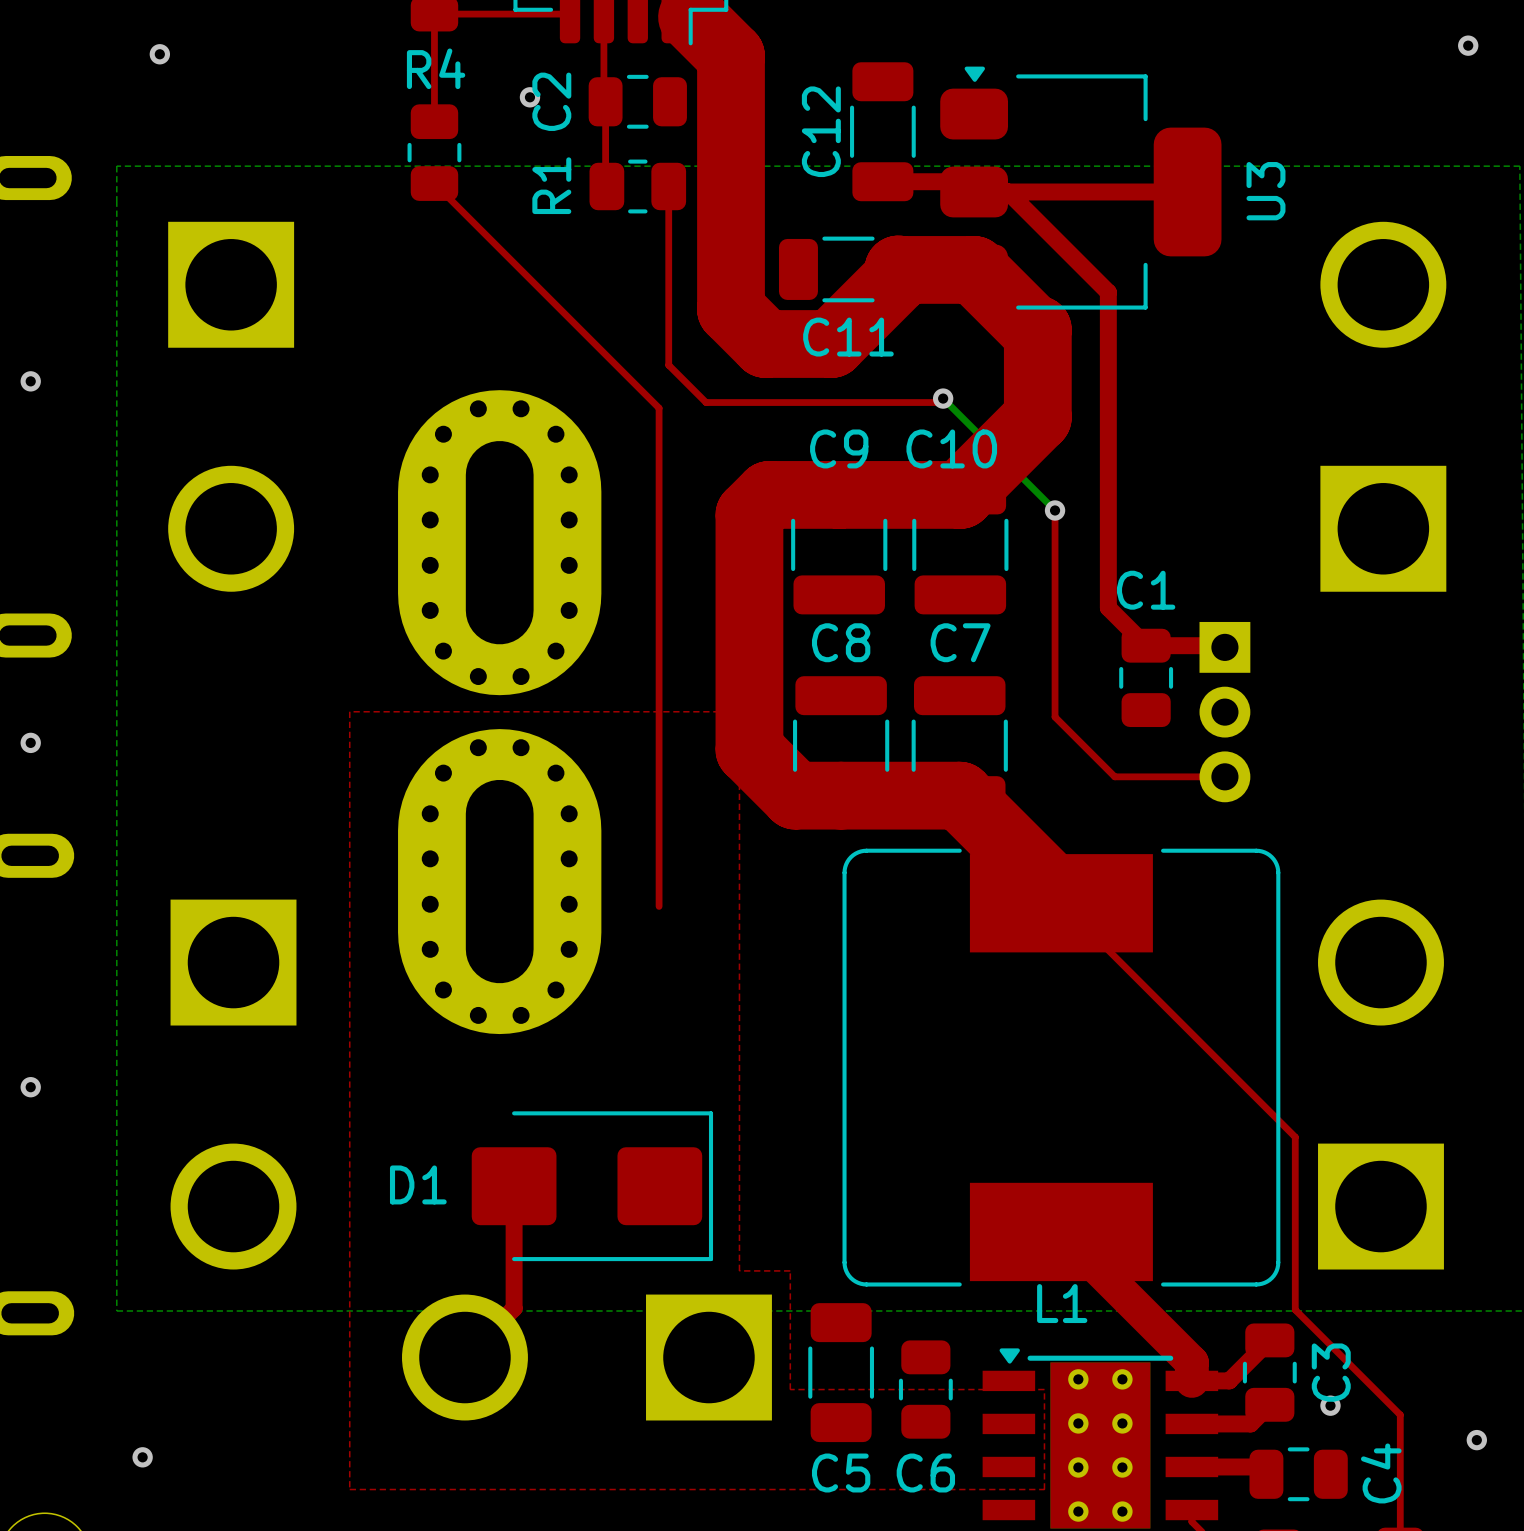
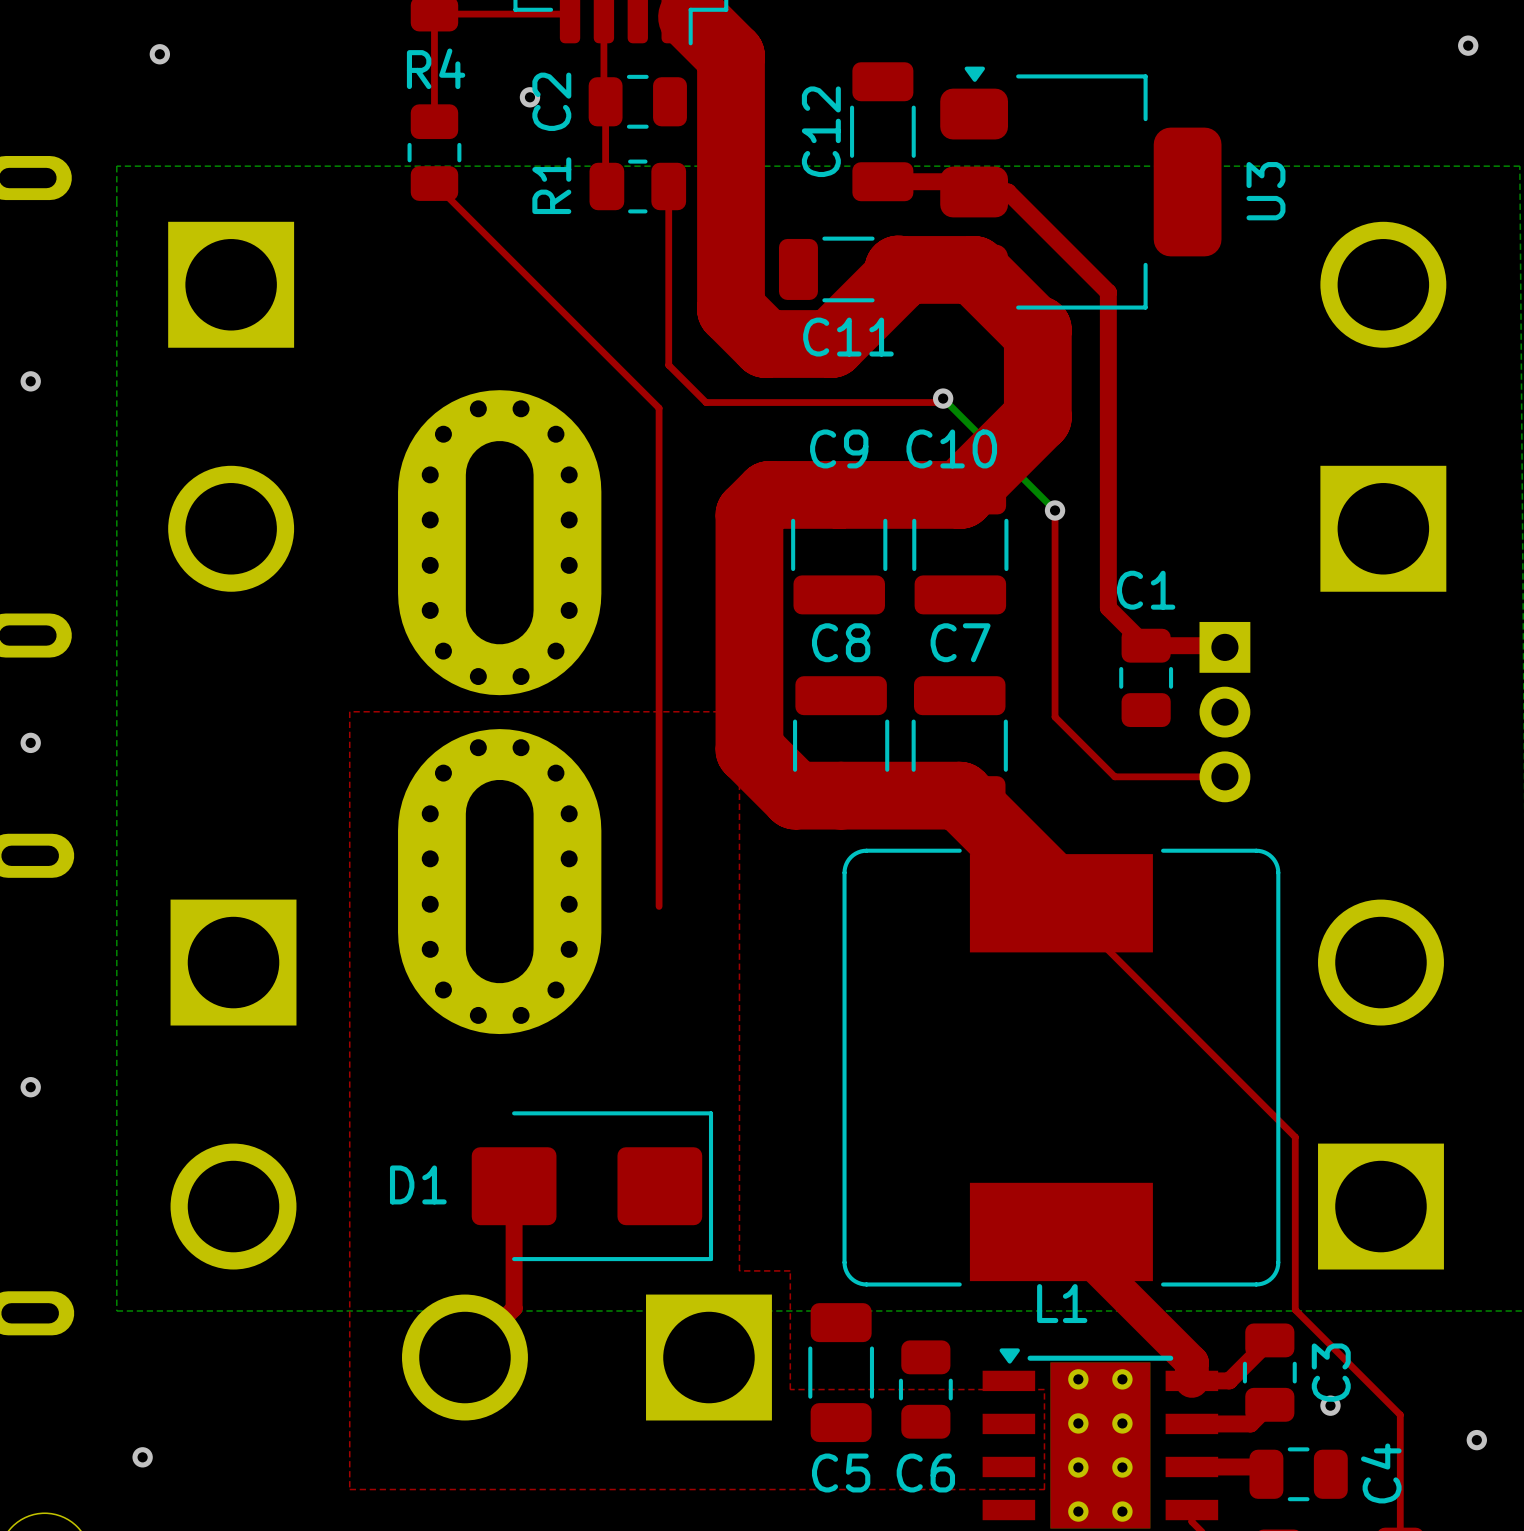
top track: (1008, 191) (1187, 191) -> none

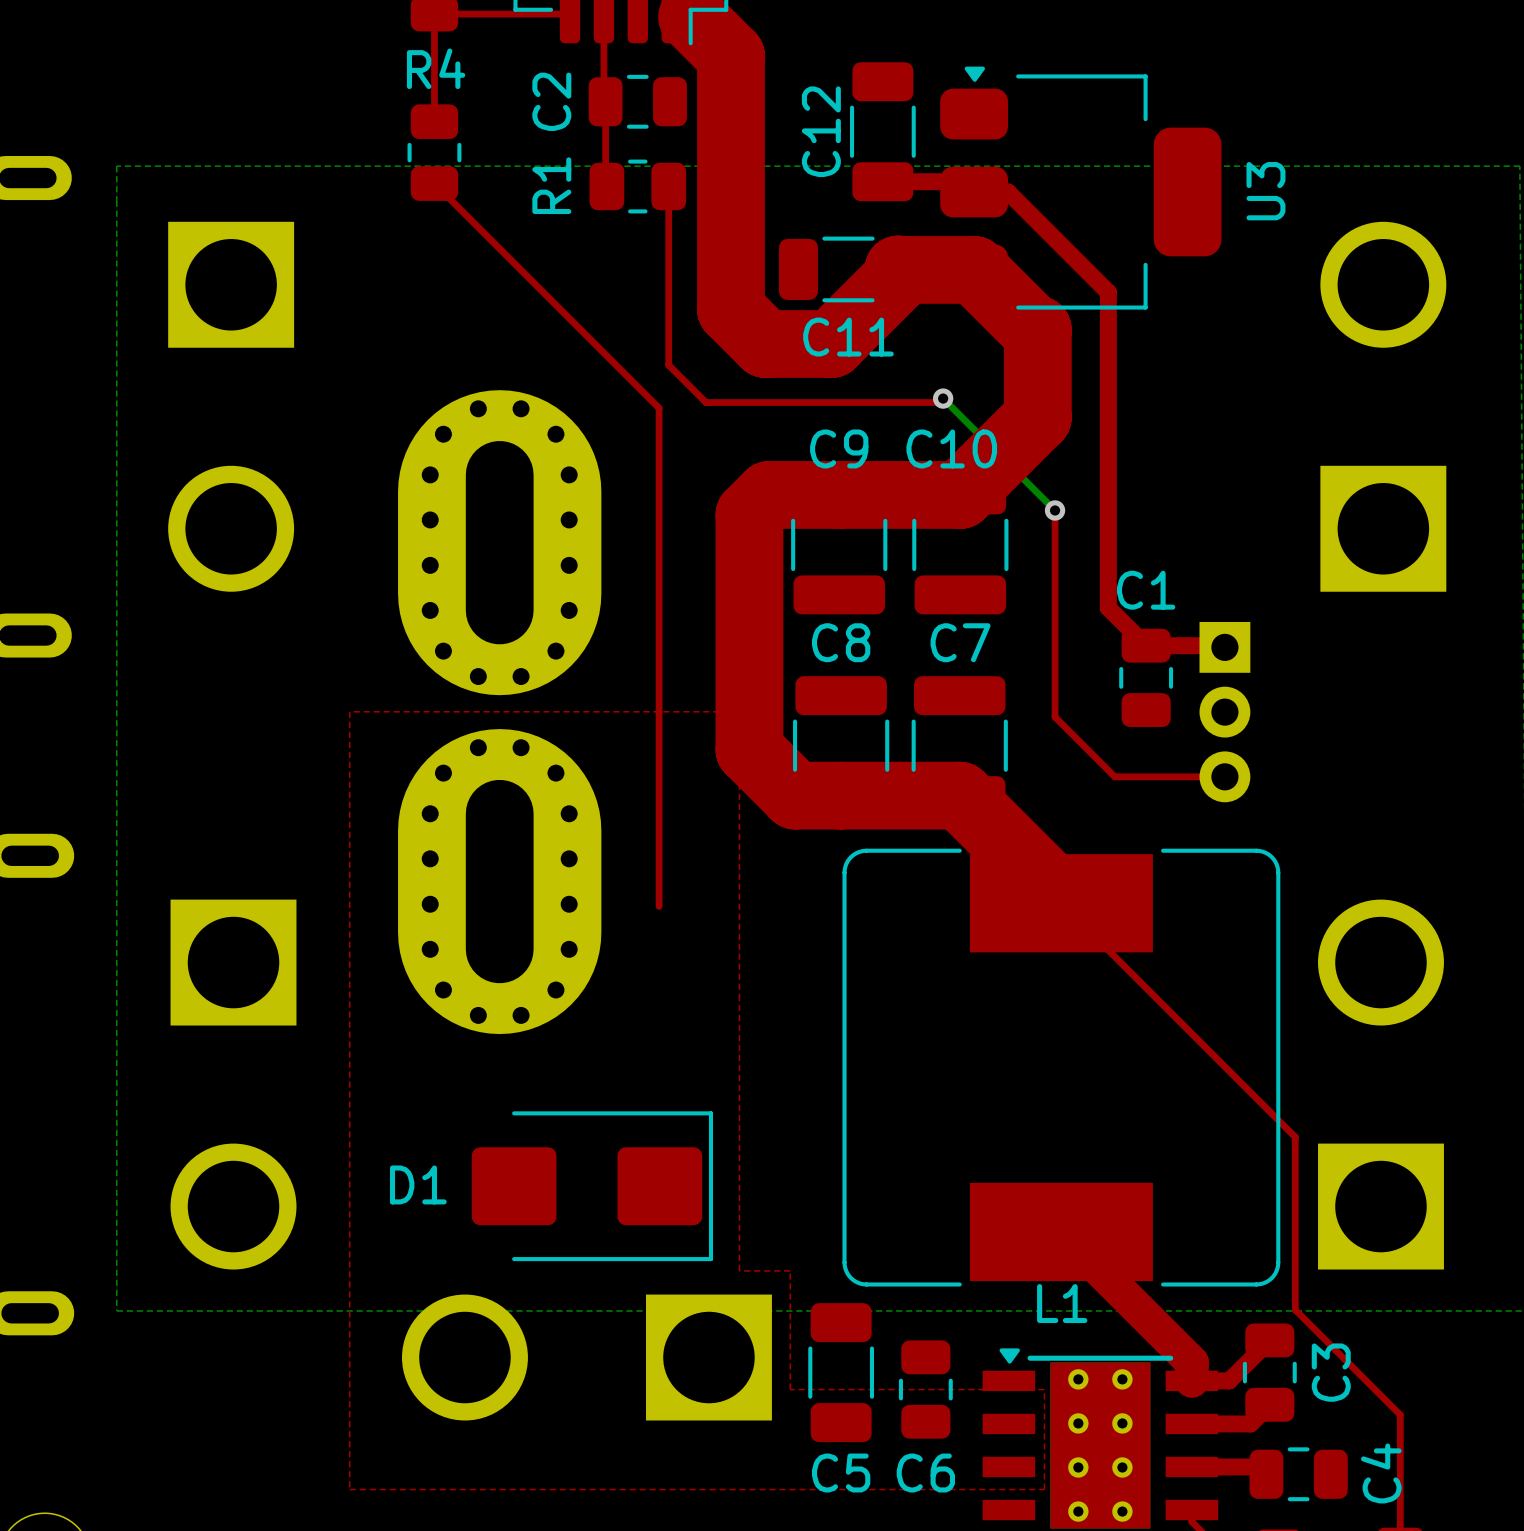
via: (1468, 45) -> none
via: (159, 54) -> none
via: (529, 97) -> none
via: (30, 381) -> none
via: (30, 742) -> none
via: (30, 1087) -> none
top track: (514, 1186) (514, 1308) (464, 1357) -> none
via: (1330, 1405) -> none
via: (1476, 1440) -> none
via: (142, 1457) -> none

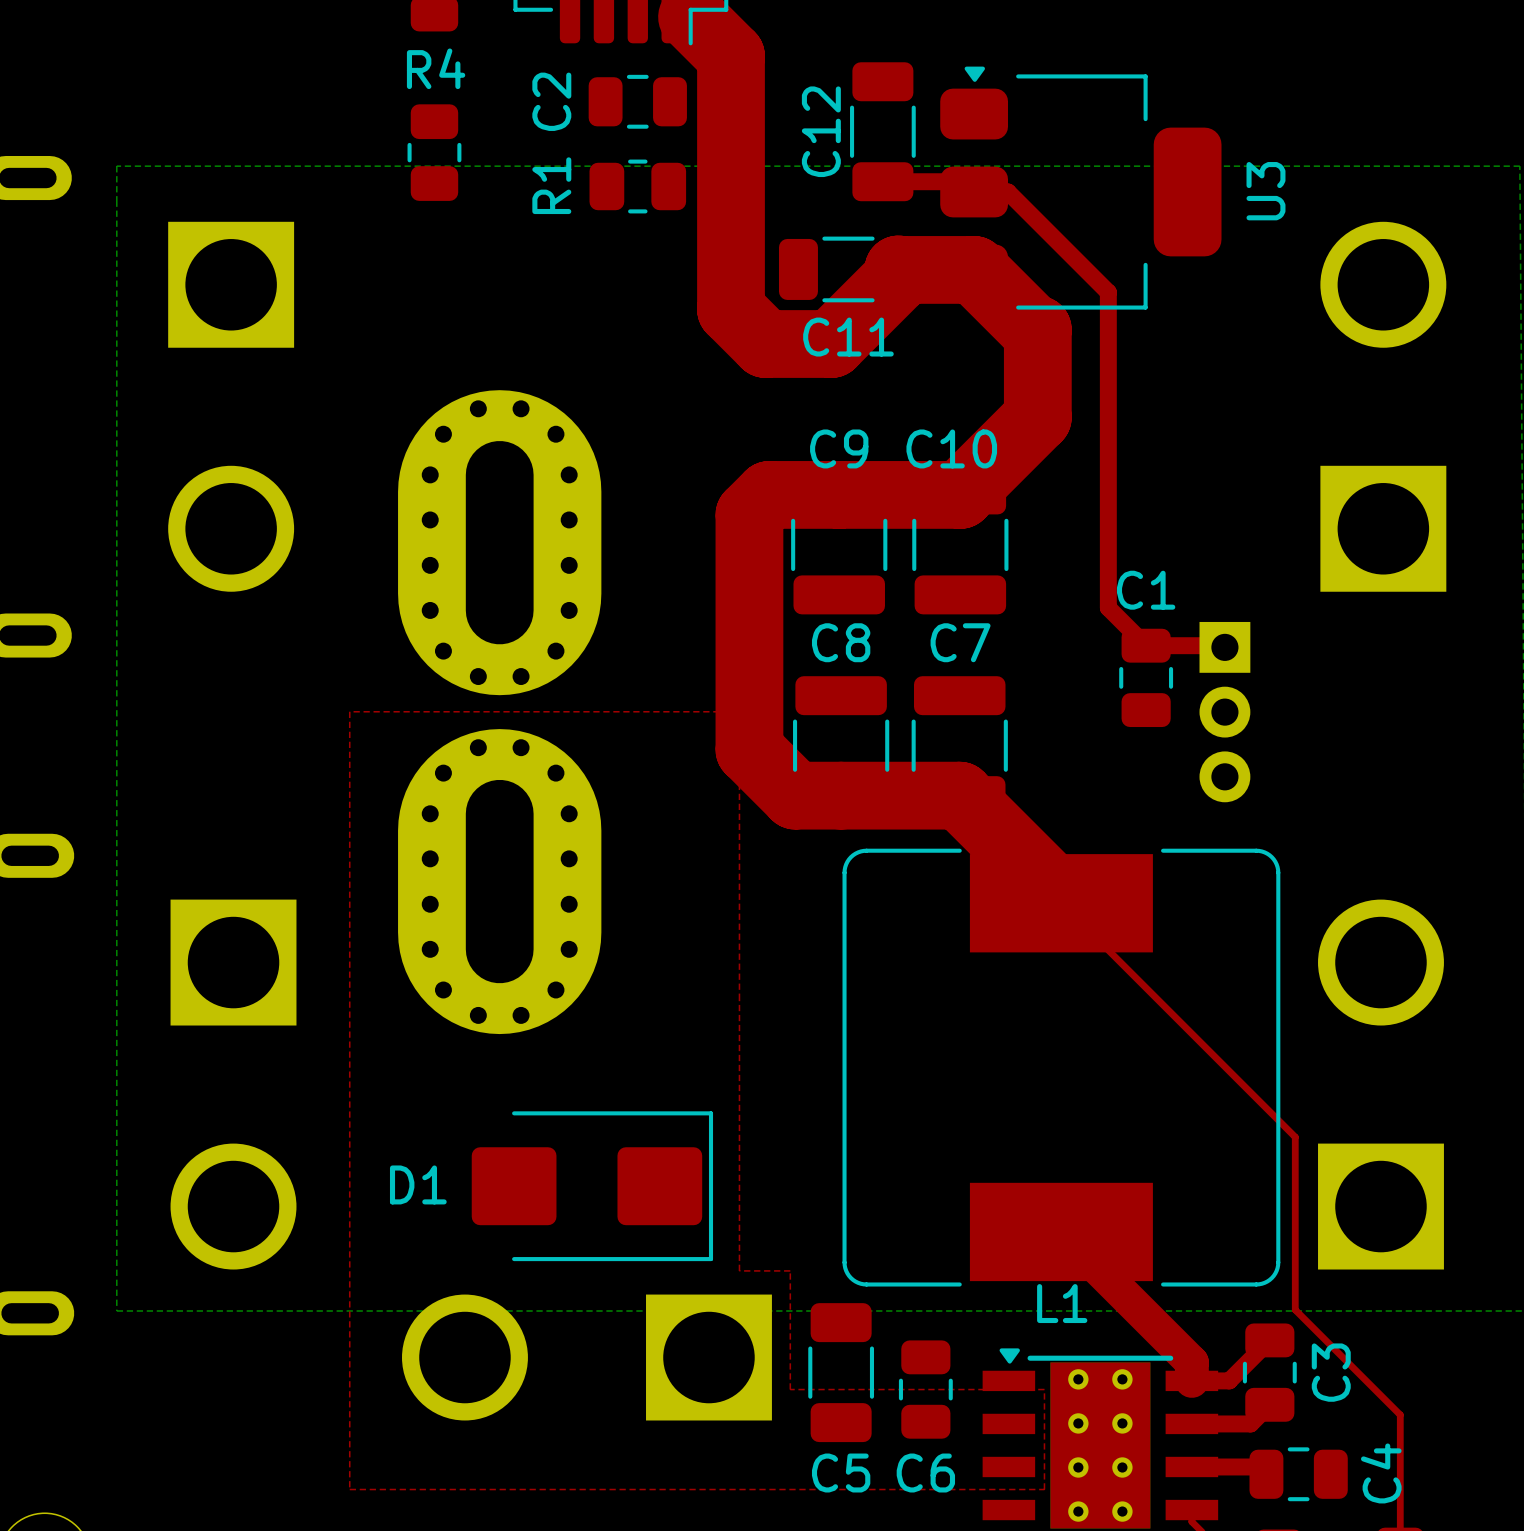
top track: (570, 17) (567, 14) (434, 14) (434, 121) -> none
top track: (603, 17) (606, 186) -> none
top track: (434, 183) (659, 408) (659, 906) -> none
top track: (668, 186) (668, 365) (706, 402) (939, 402) (943, 398) -> none
bottom track: (943, 398) (1055, 510) -> none
via: (943, 398) -> none
top track: (1055, 510) (1055, 717) (1114, 776) (1224, 776) -> none
via: (1055, 510) -> none

